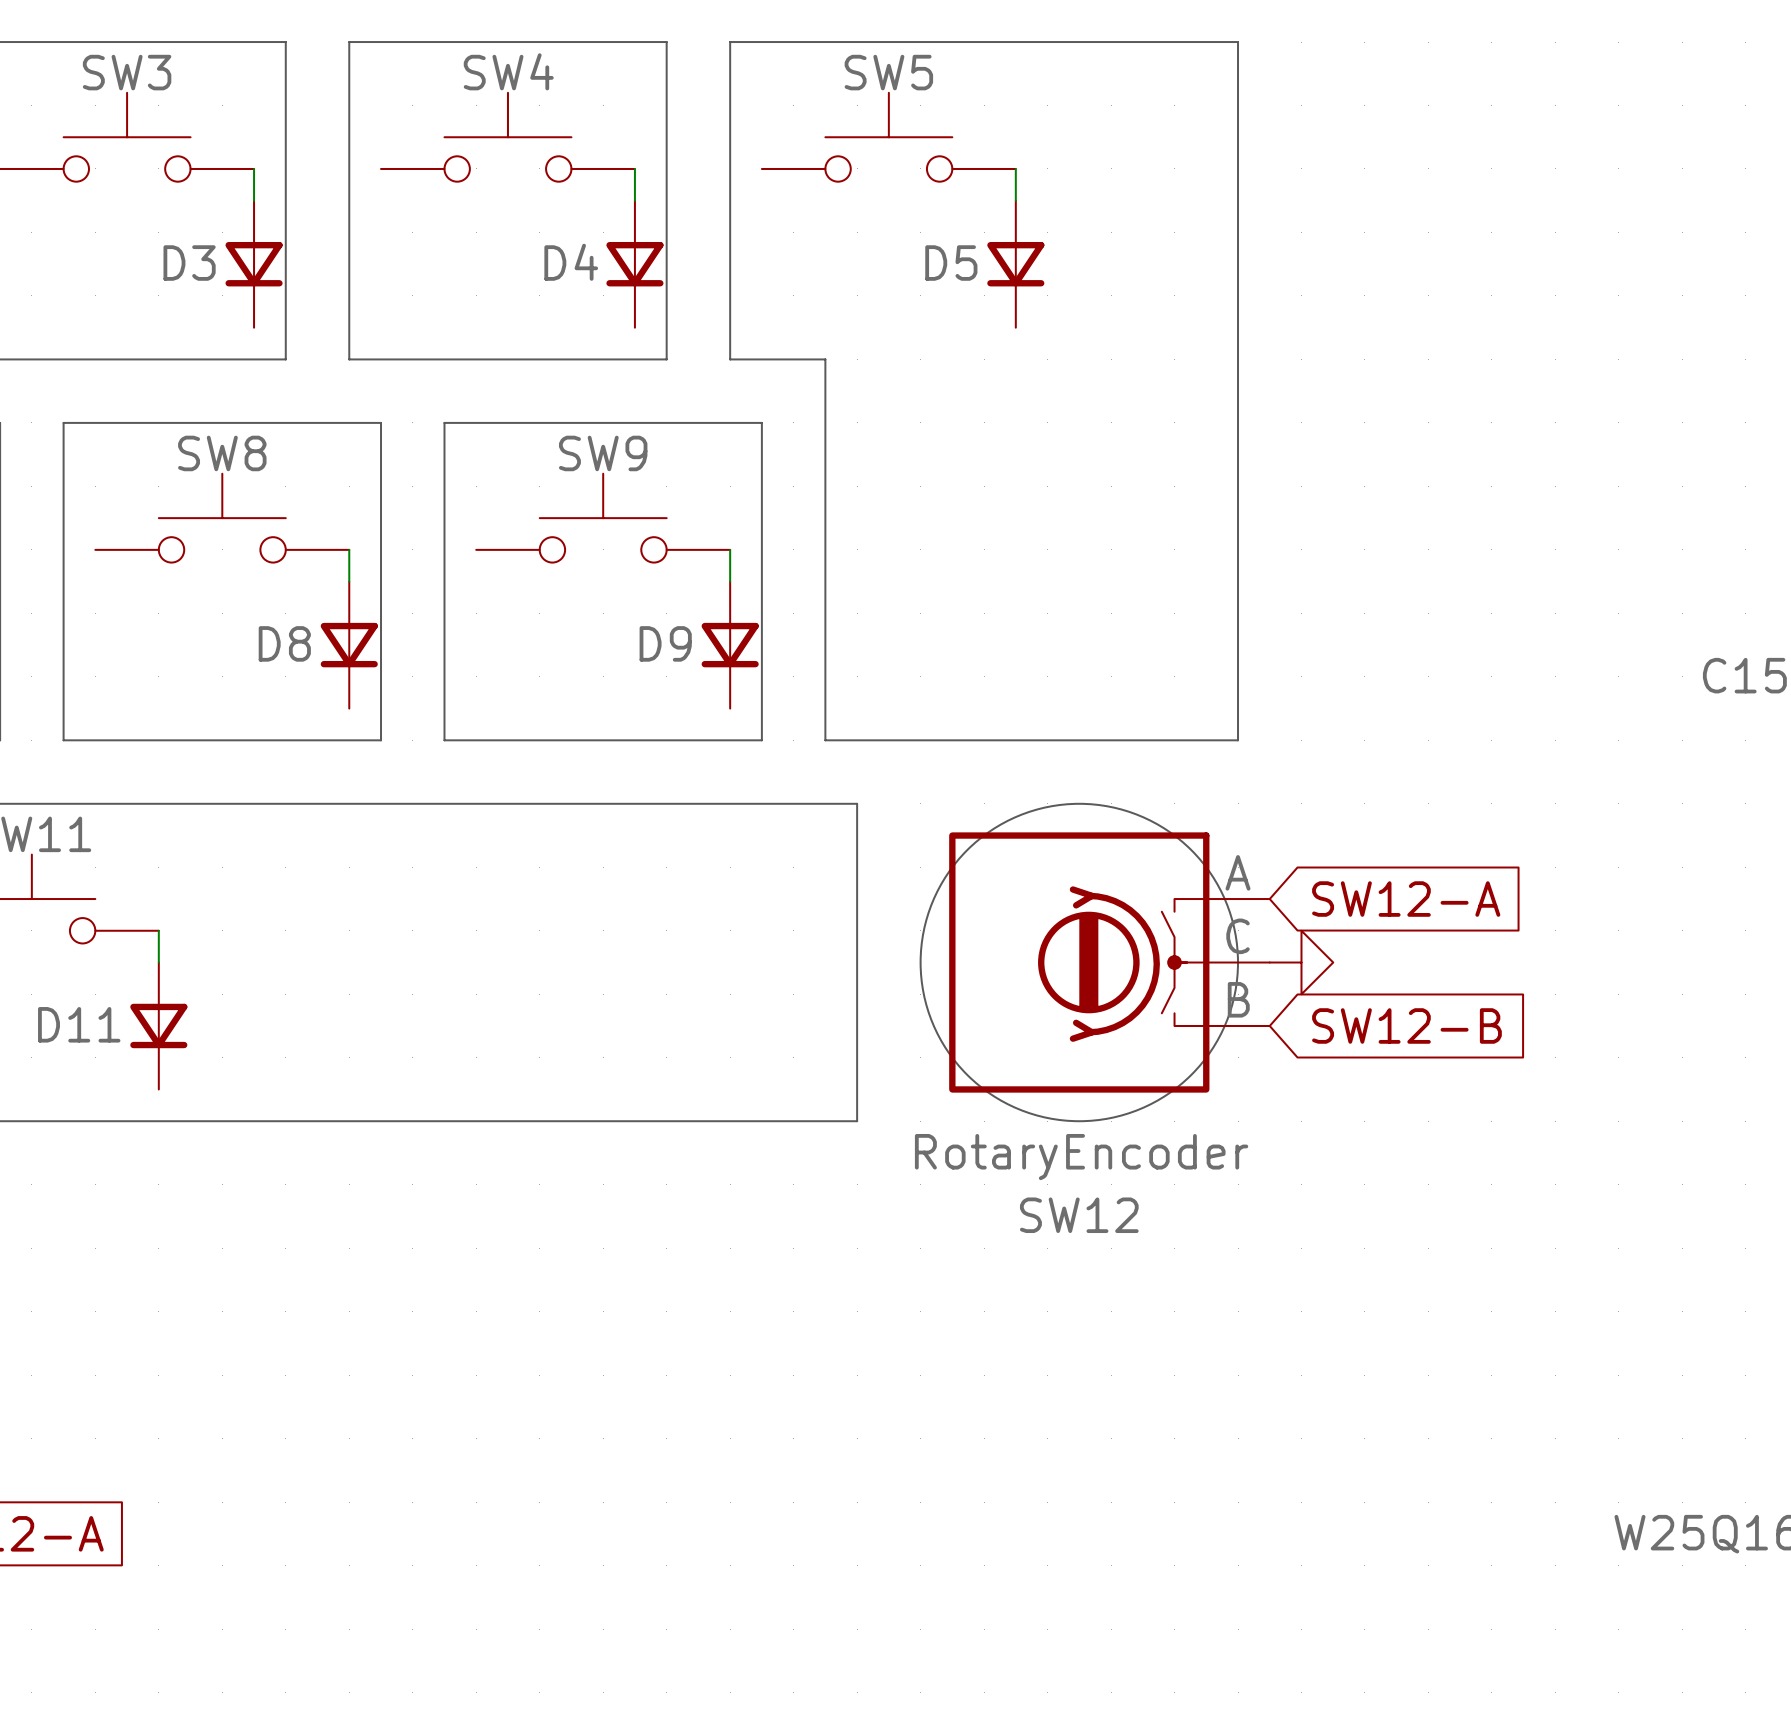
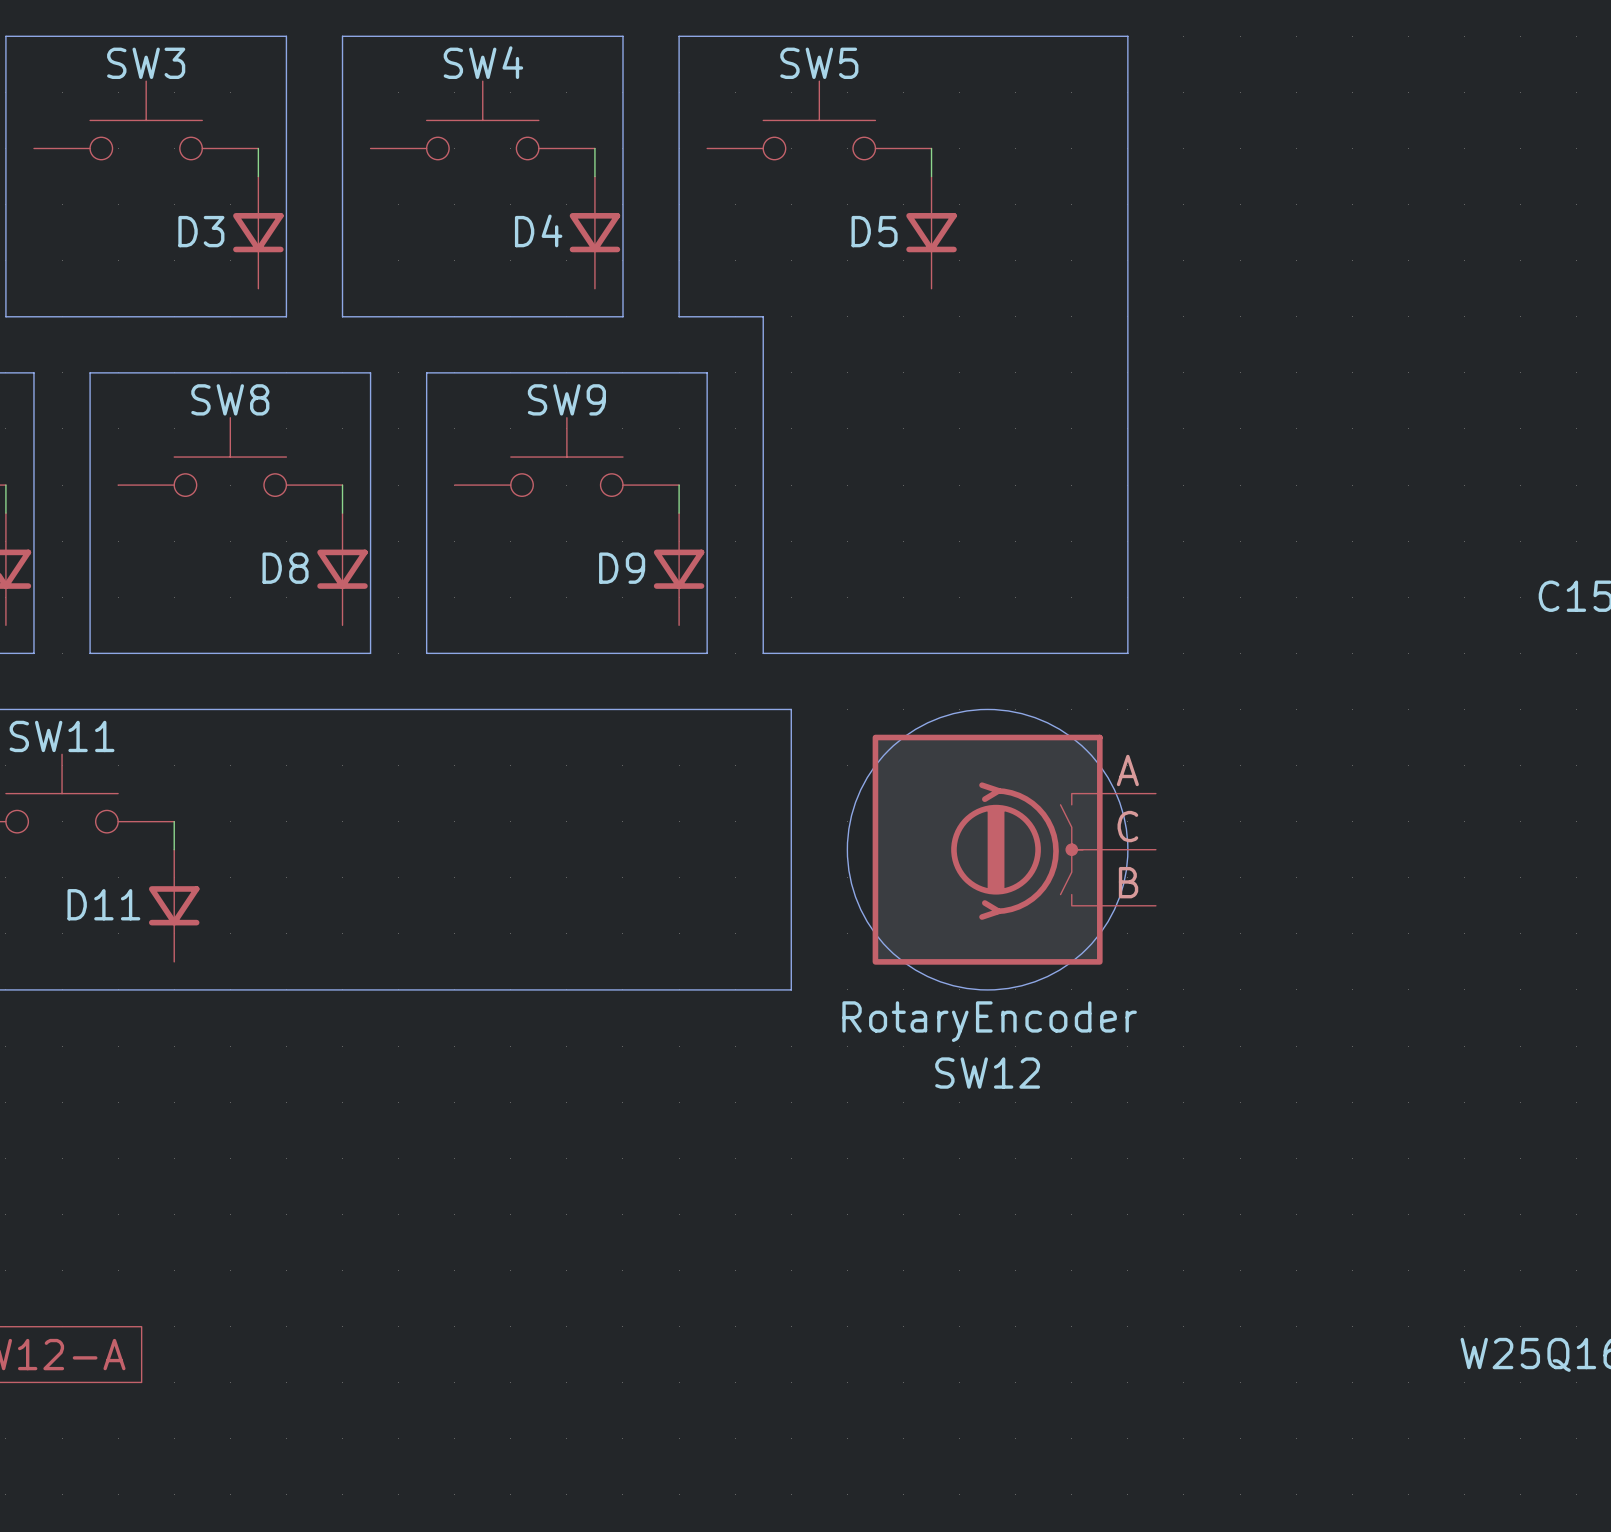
global label: SW12-A (1406, 899) -> none
power symbol: (1301, 962) -> none
global label: SW12-B (1406, 1025) -> none

